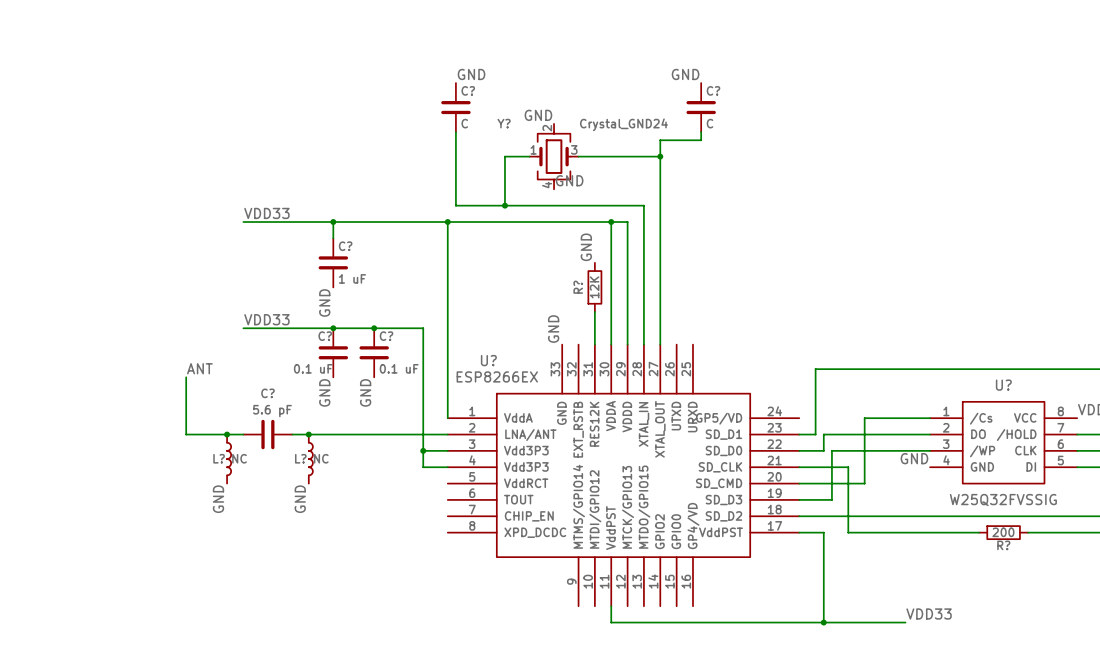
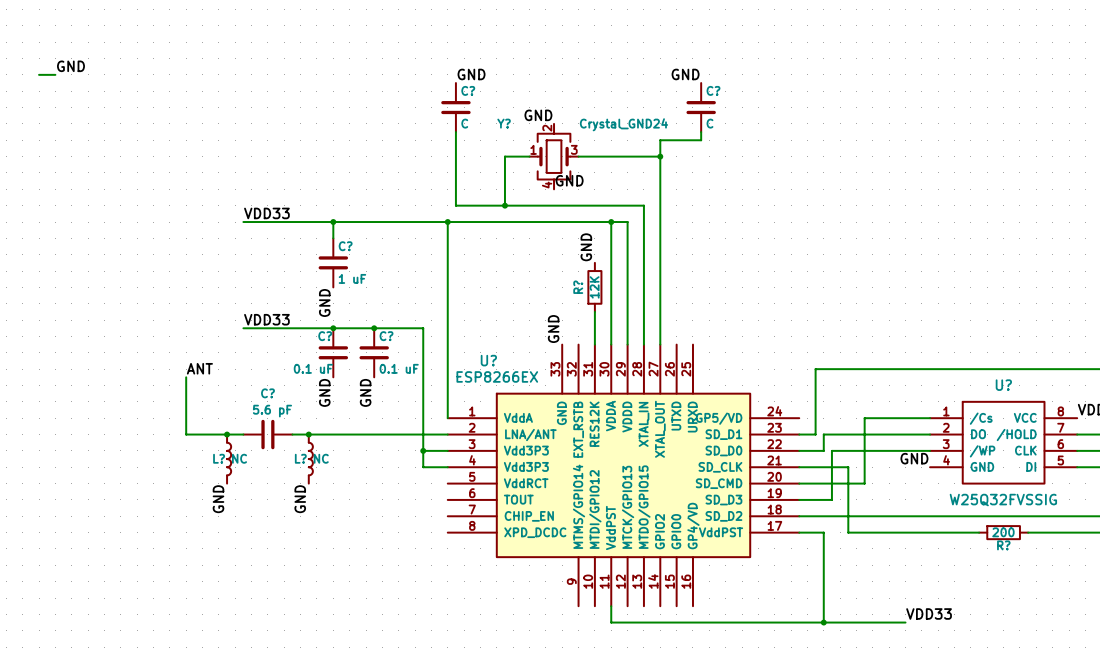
label: none -> GND (70, 66)
wire: none -> (39, 74) (55, 74)

